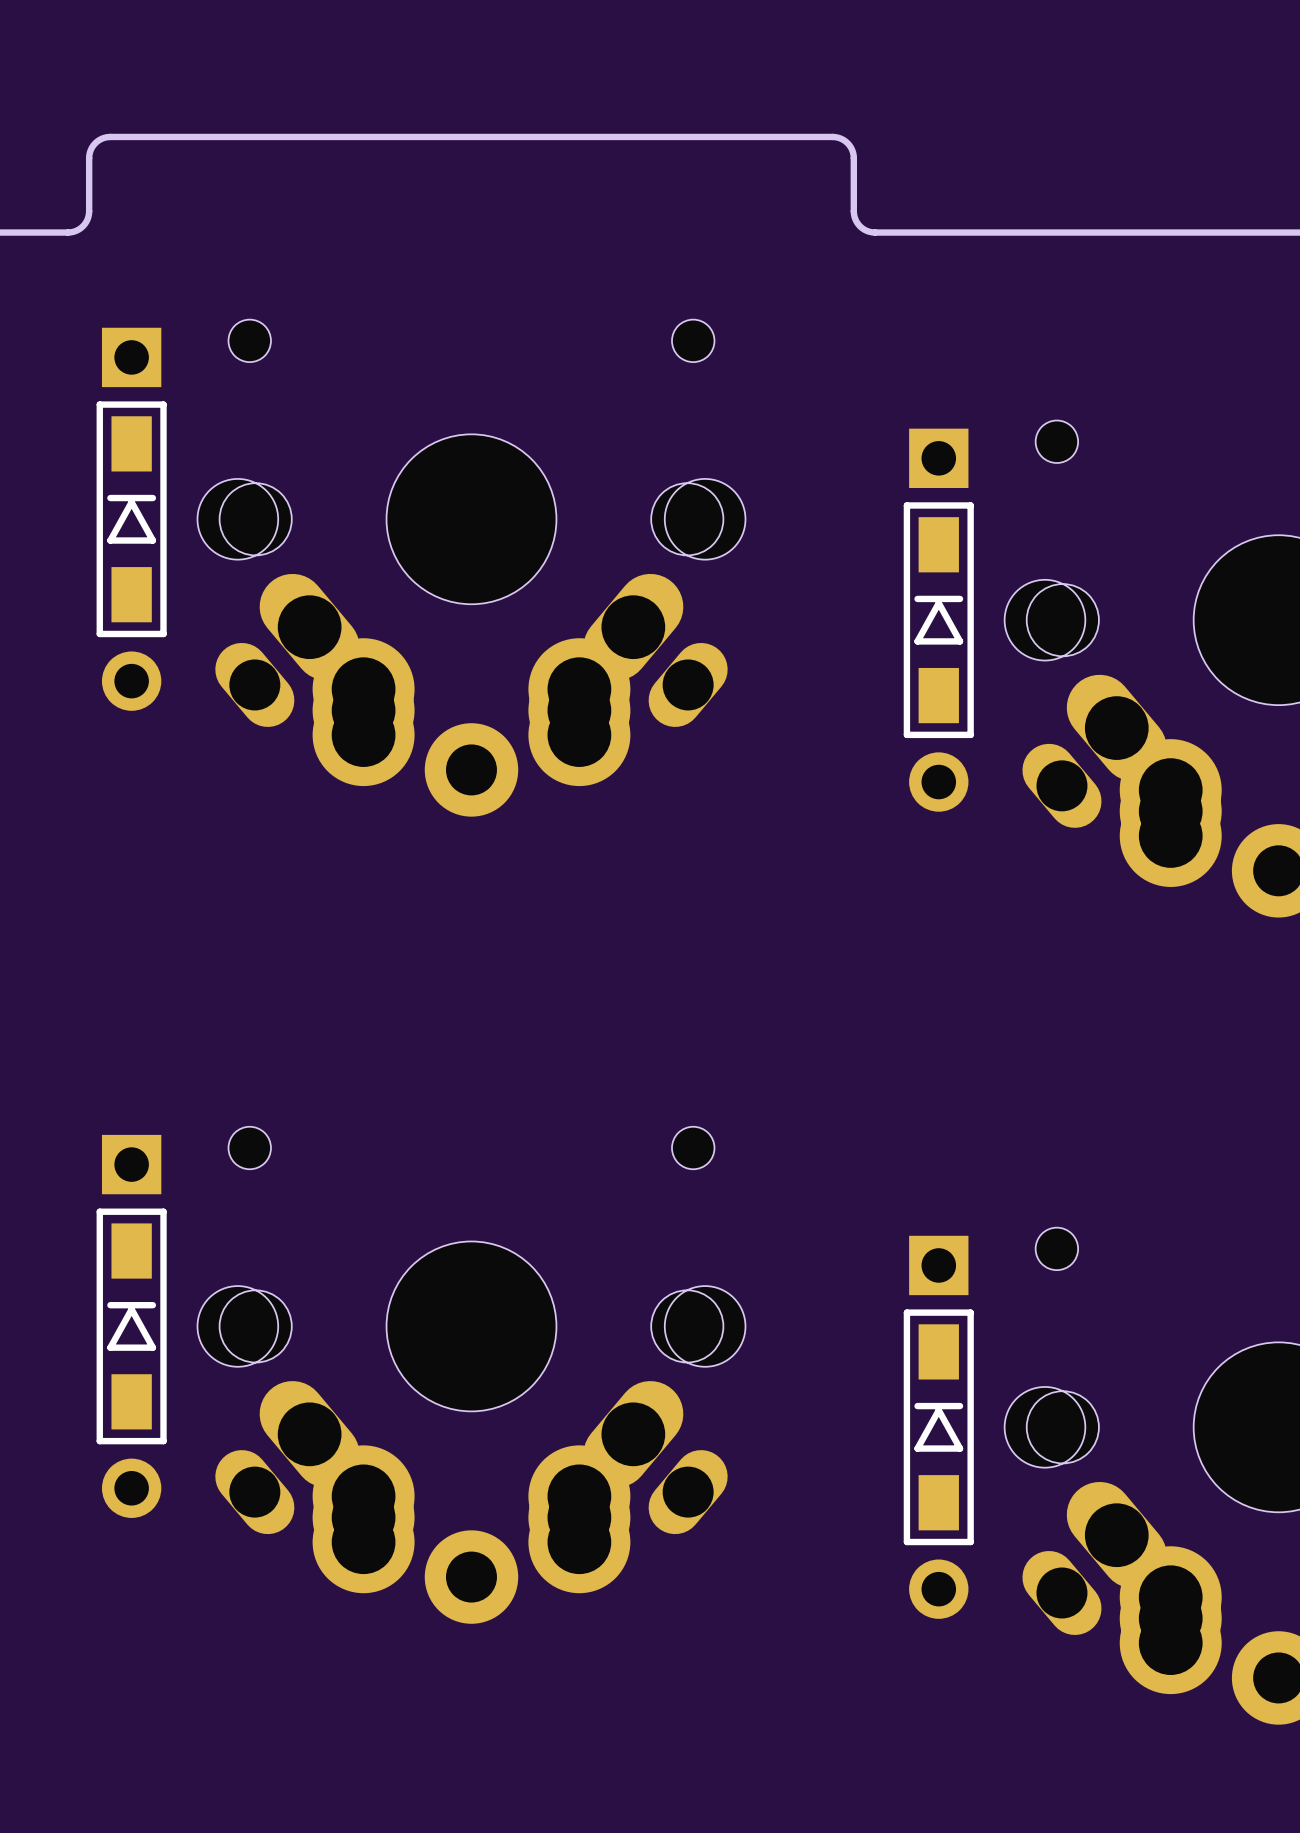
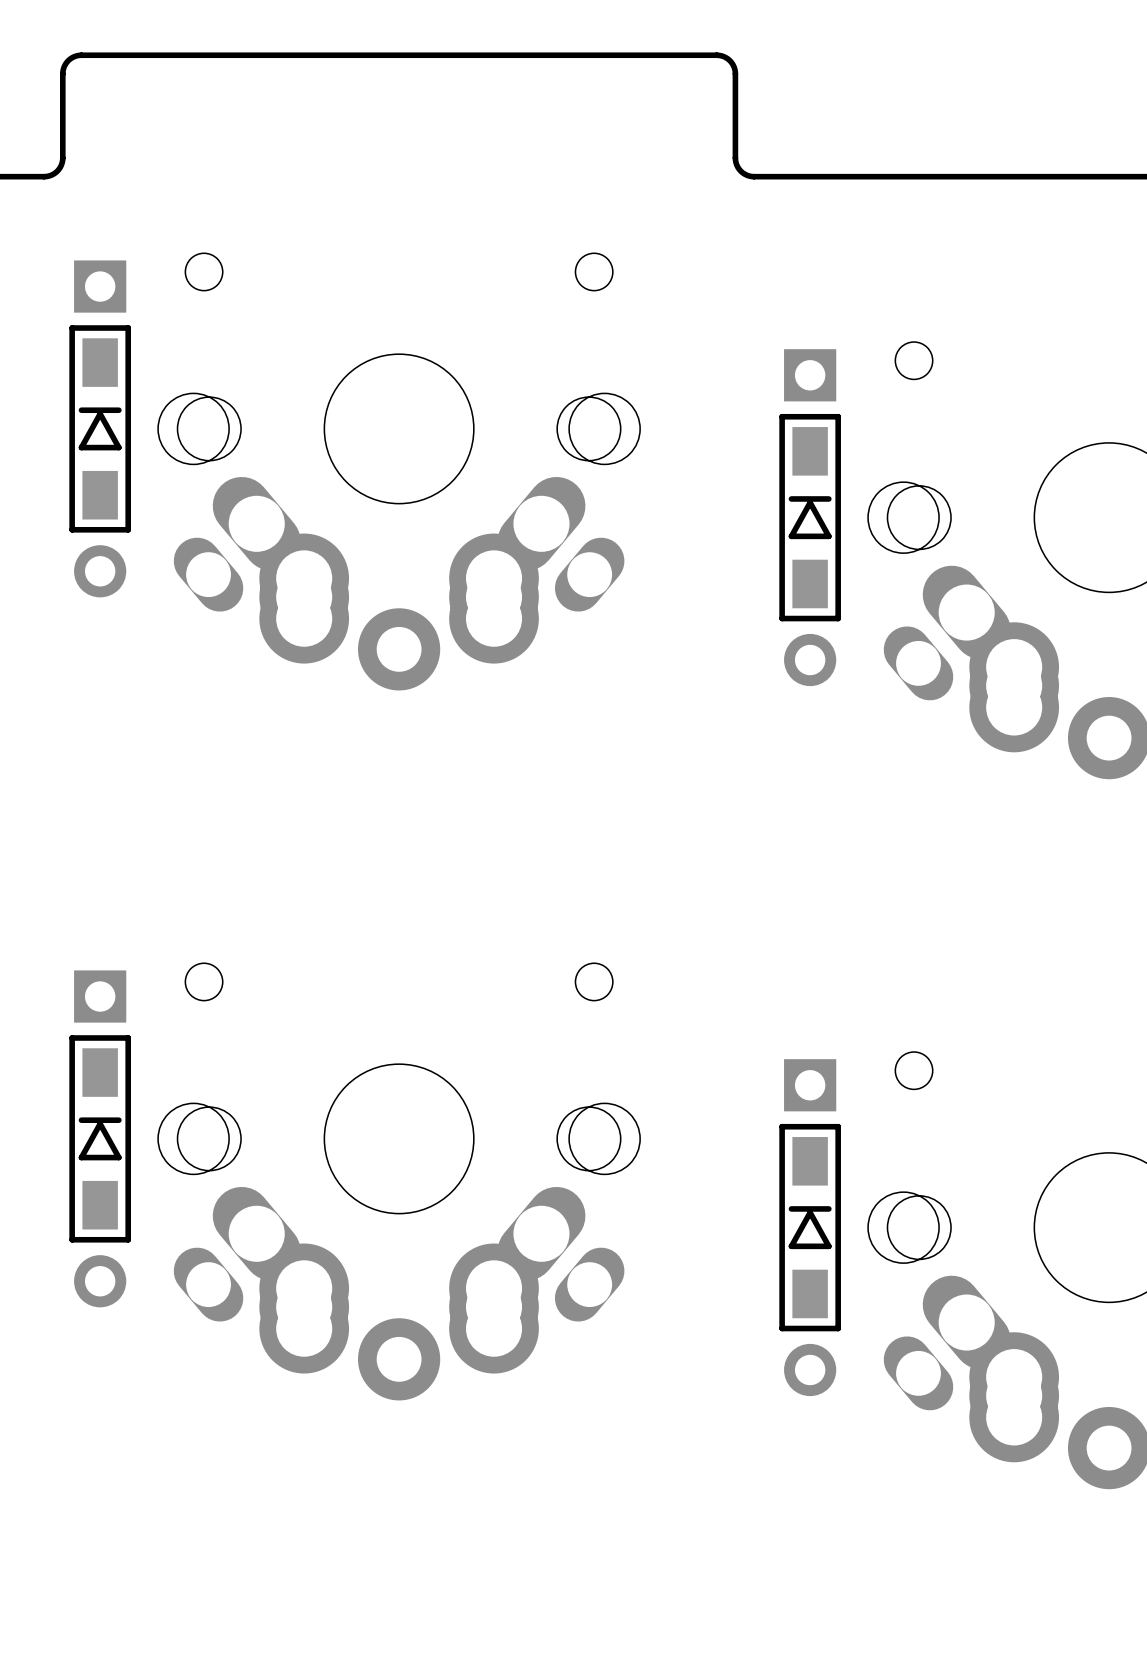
board edge: (853, 158) (852, 150) (847, 143) (840, 138) (832, 136) (110, 136) (102, 138) (95, 143) (90, 150) (89, 158) -> (735, 111) (734, 69) (728, 59) (716, 55) (79, 55) (68, 60) (63, 69) (62, 111)

